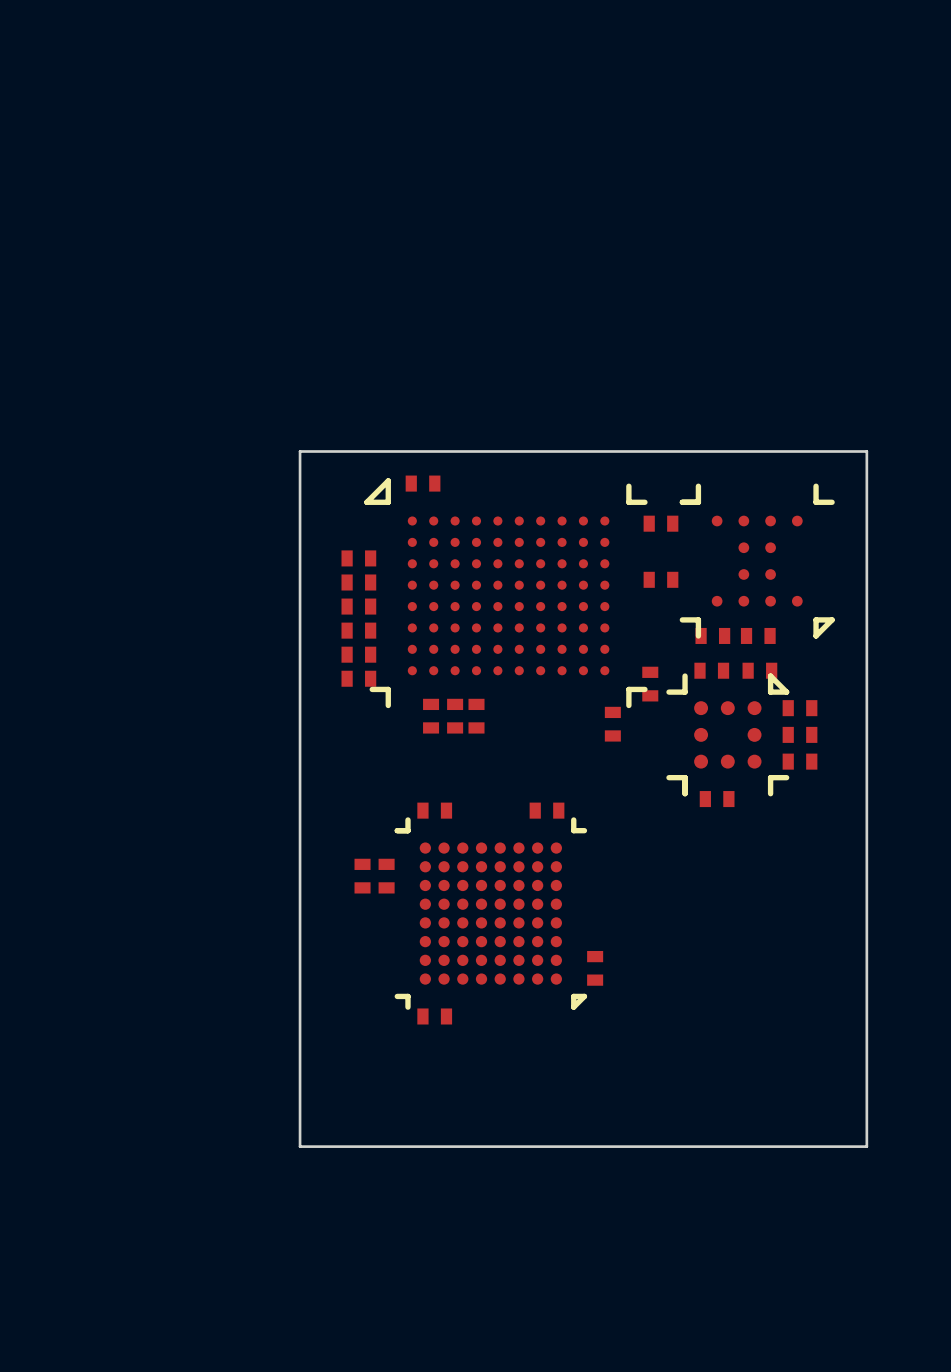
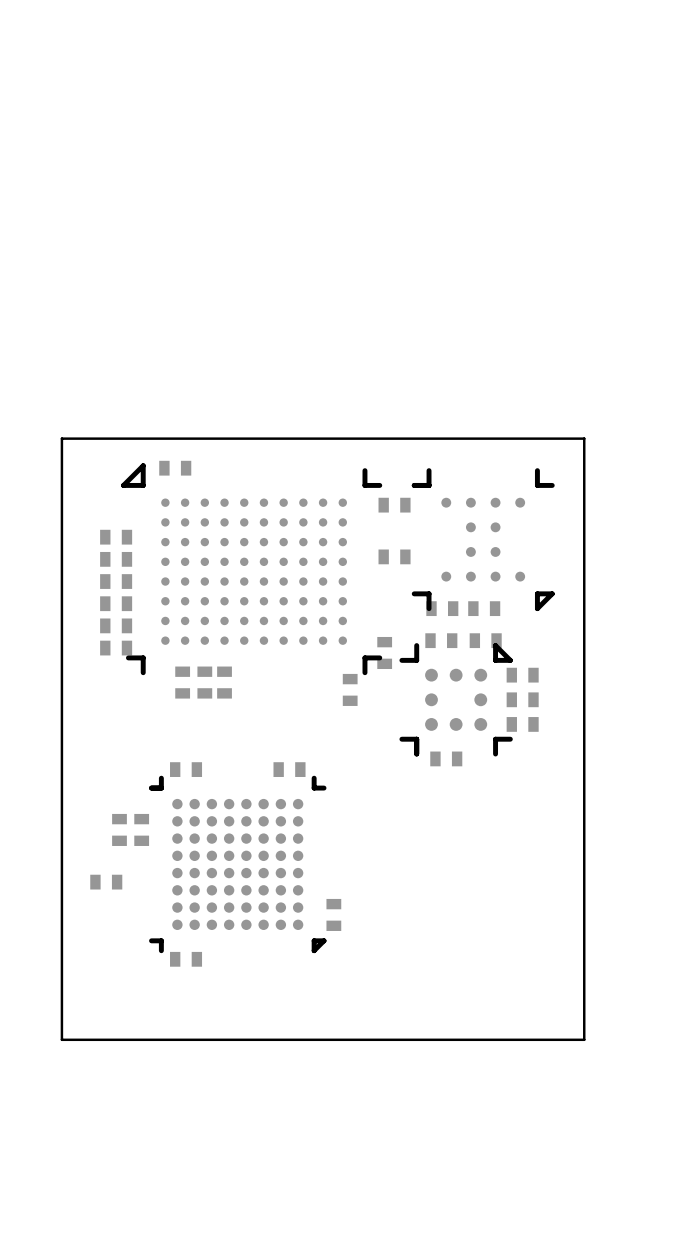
part: none -> (106, 882)
board edge: (300, 1103) (300, 1146) (866, 1146) (866, 1103) -> (61, 1039) (584, 1039)

